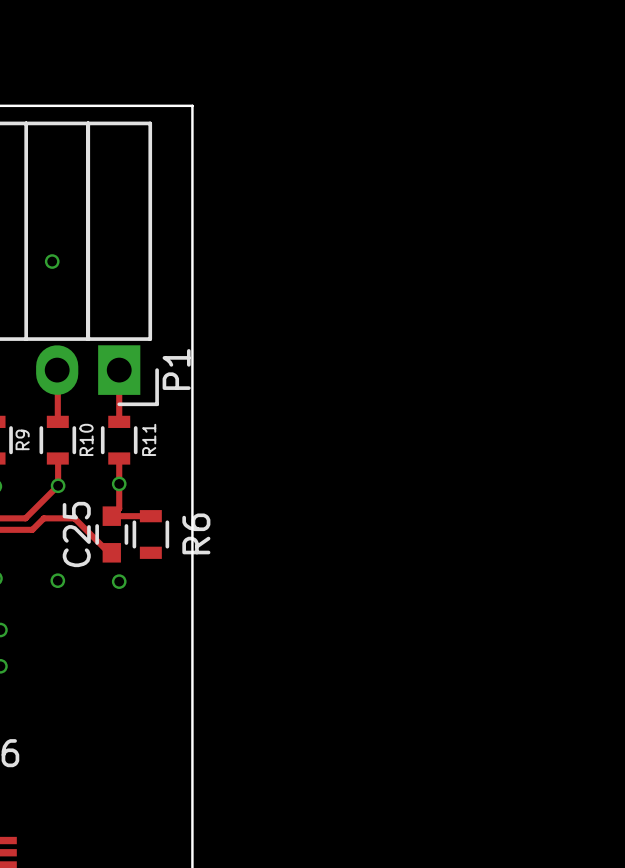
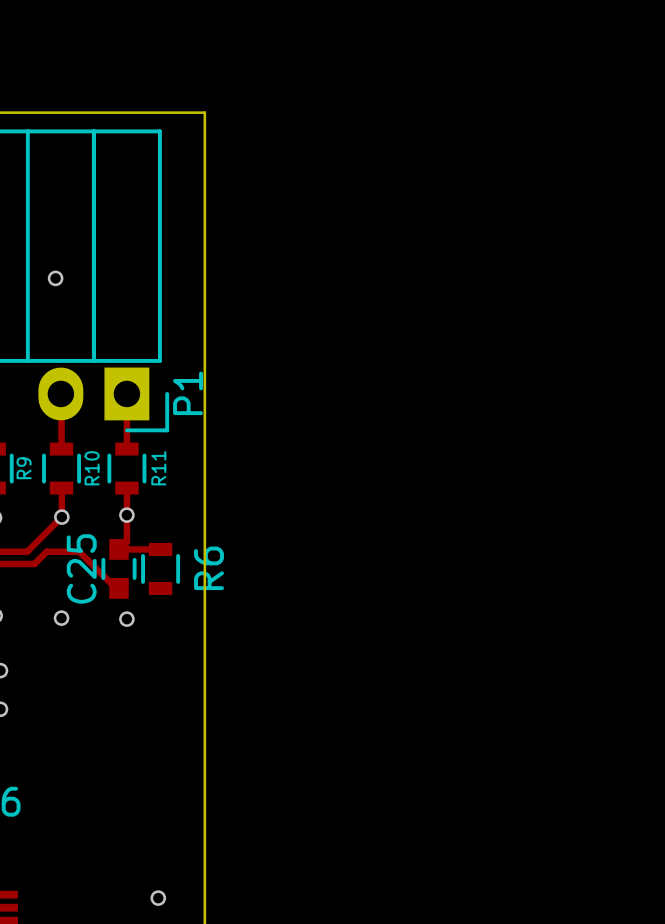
via: none -> (158, 898)

